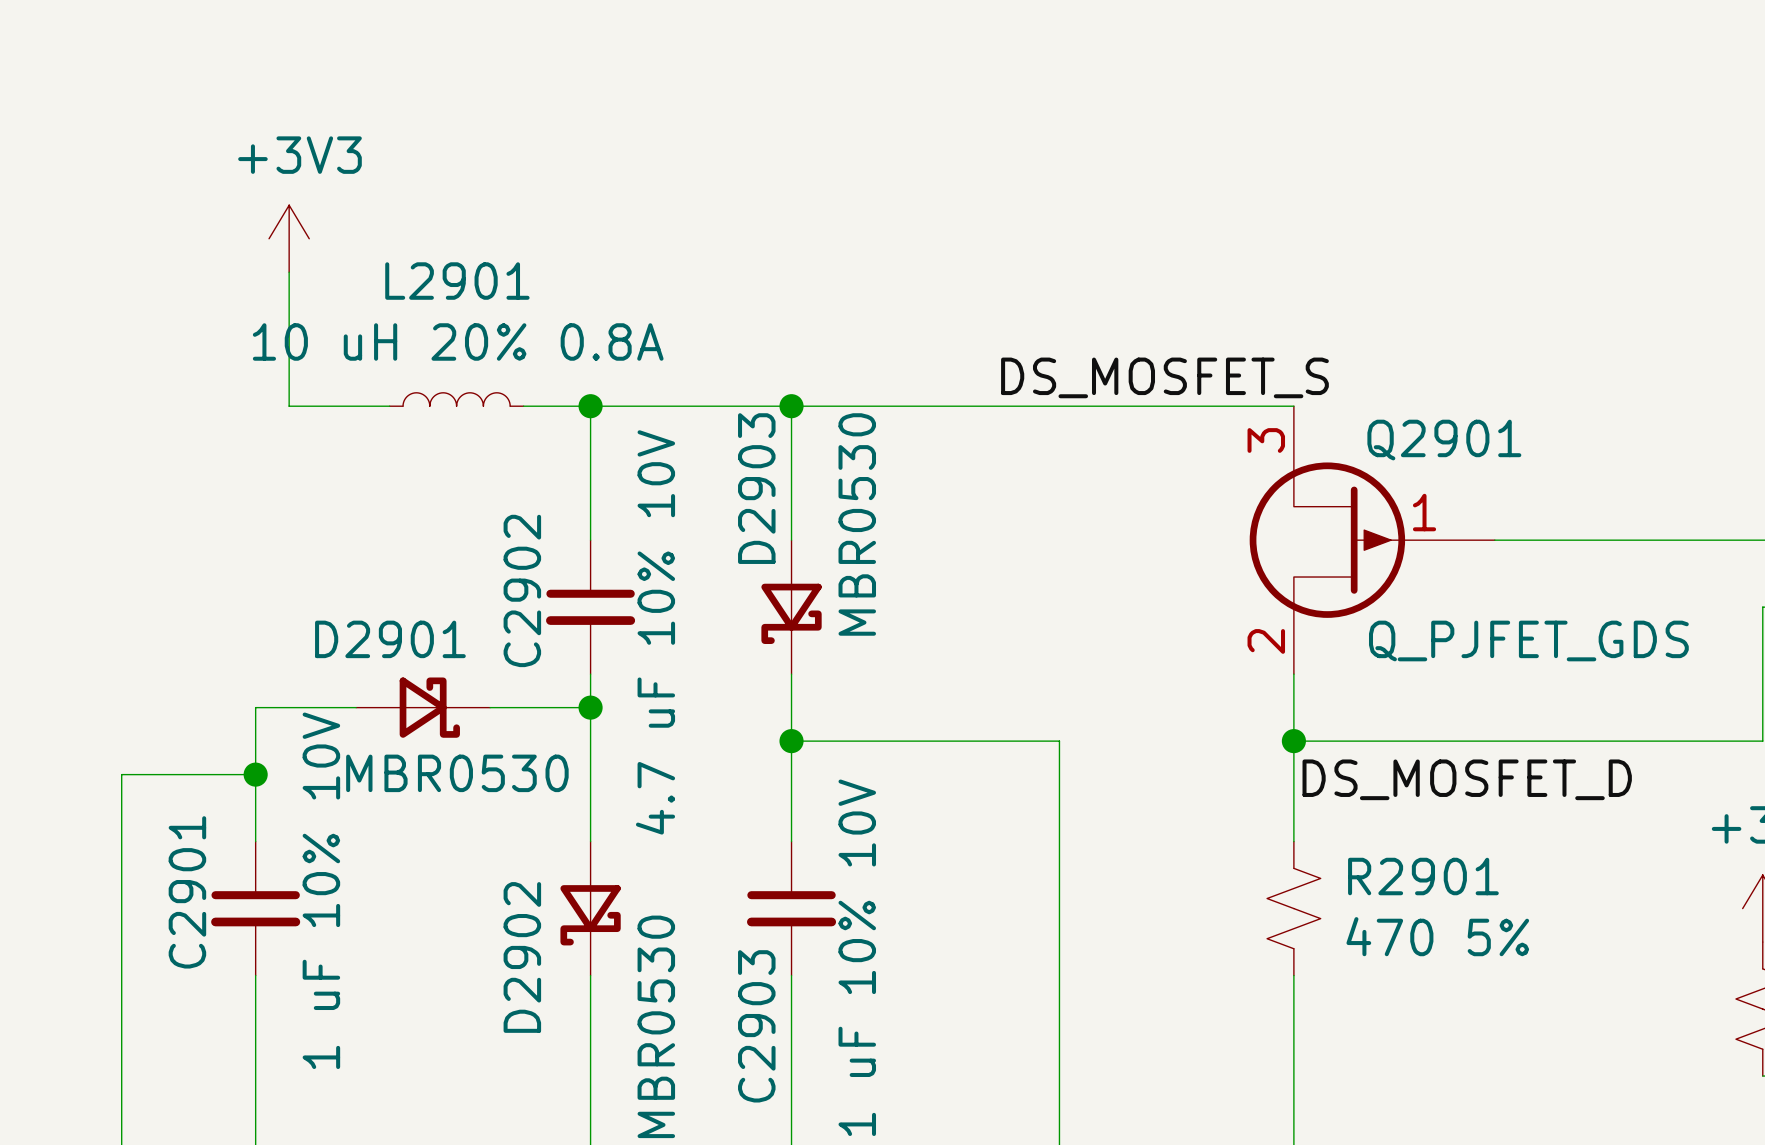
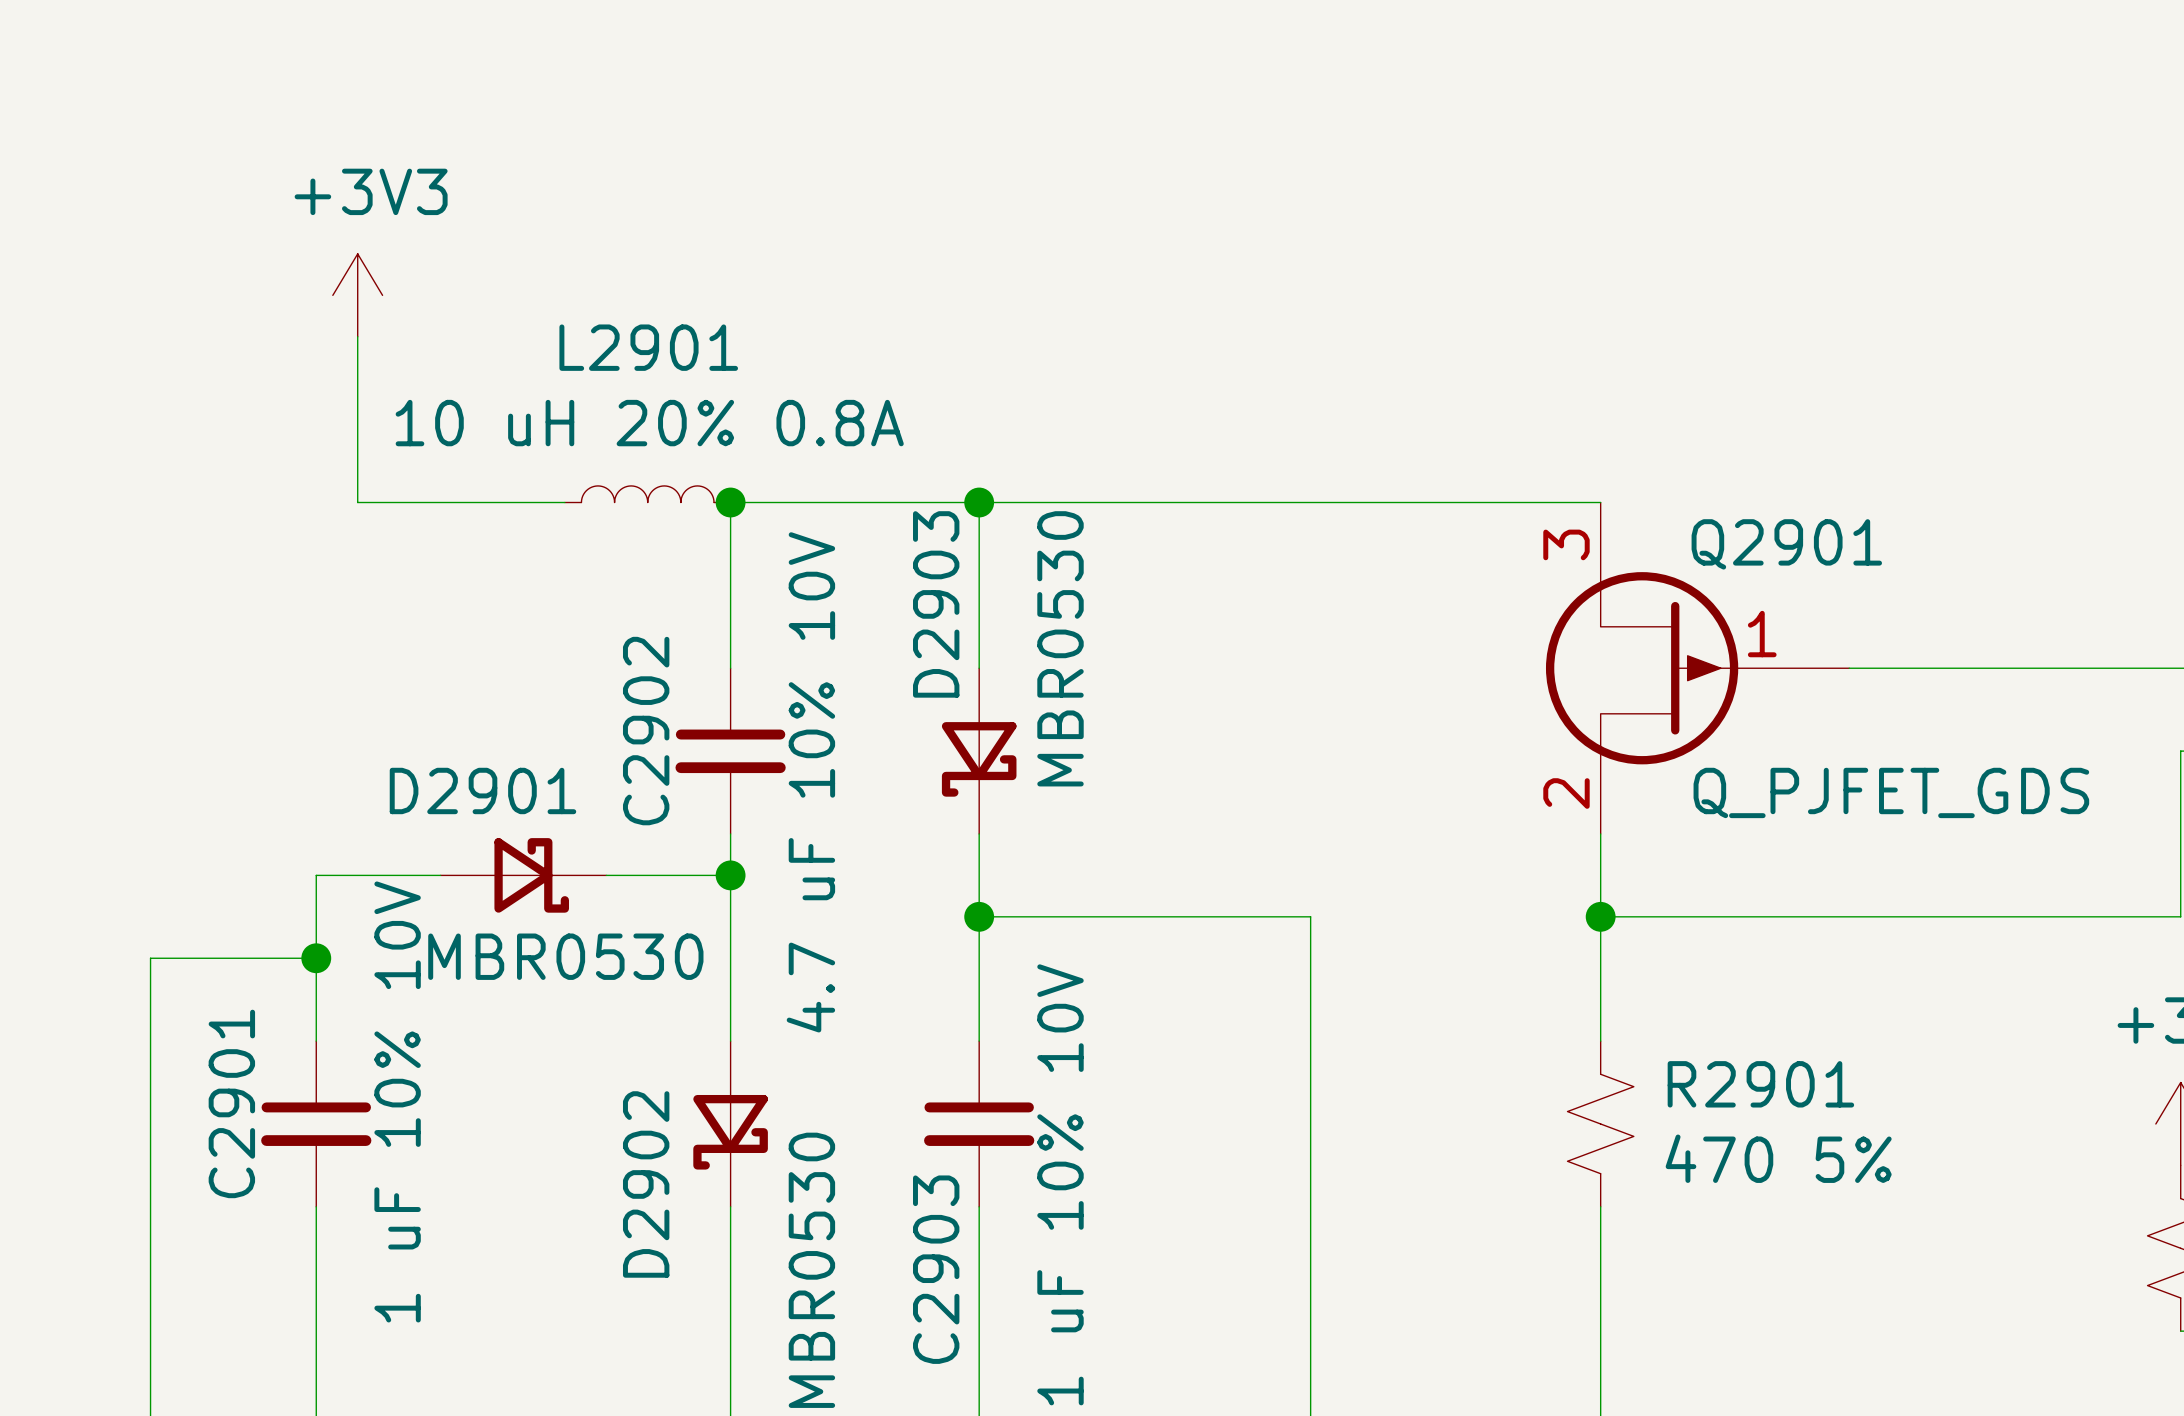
label: DS_MOSFET_S (1164, 377) -> none
L2901 position: (456, 399) -> (647, 494)
wire: (523, 406) (590, 406) -> (482, 502) (564, 502)
label: DS_MOSFET_D (1467, 779) -> none

